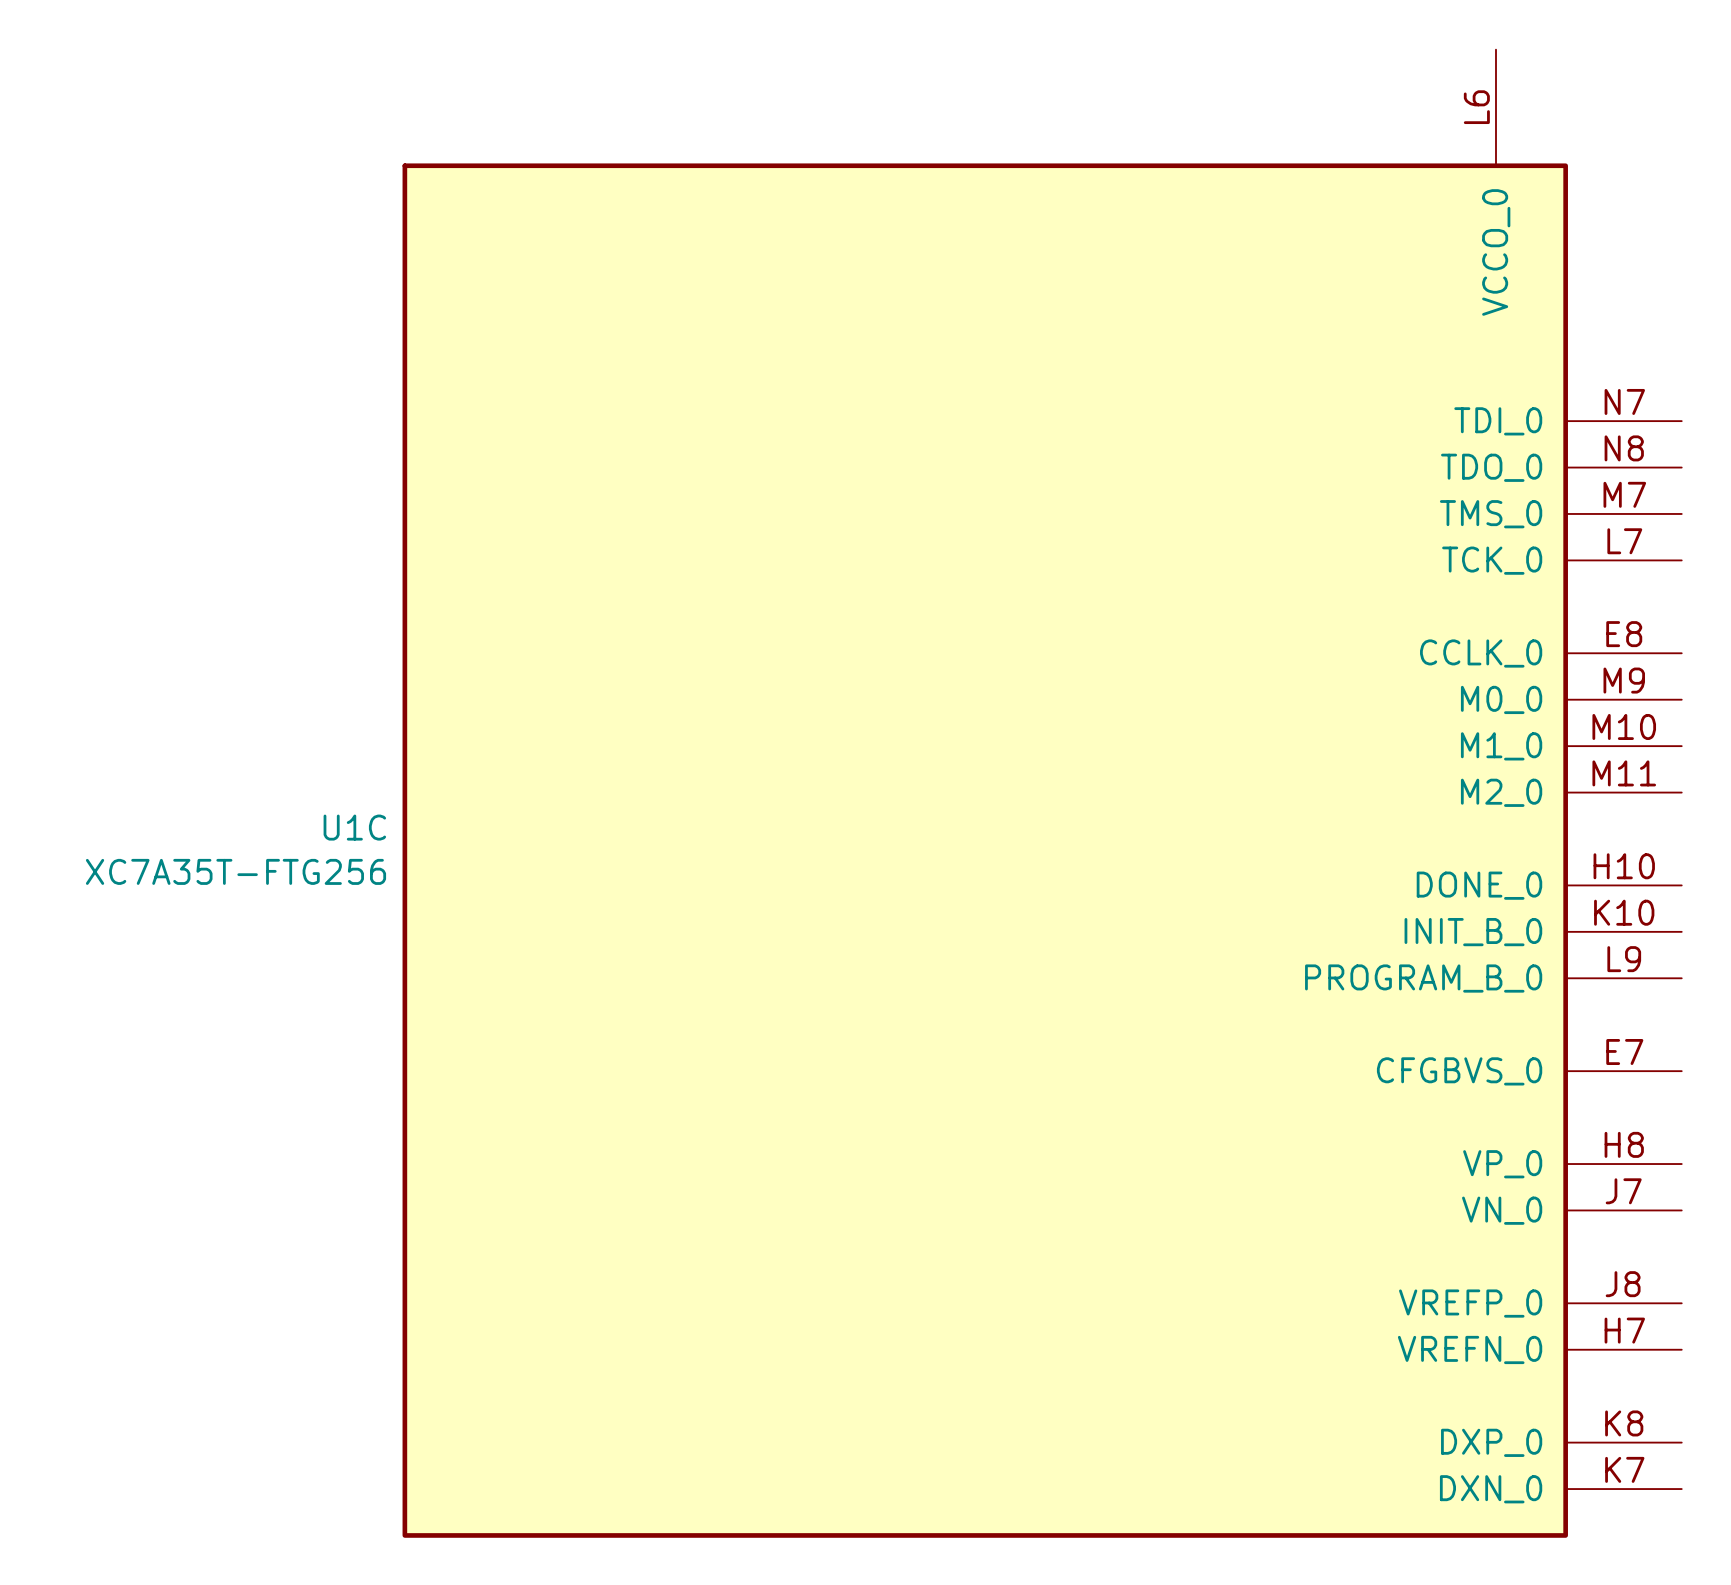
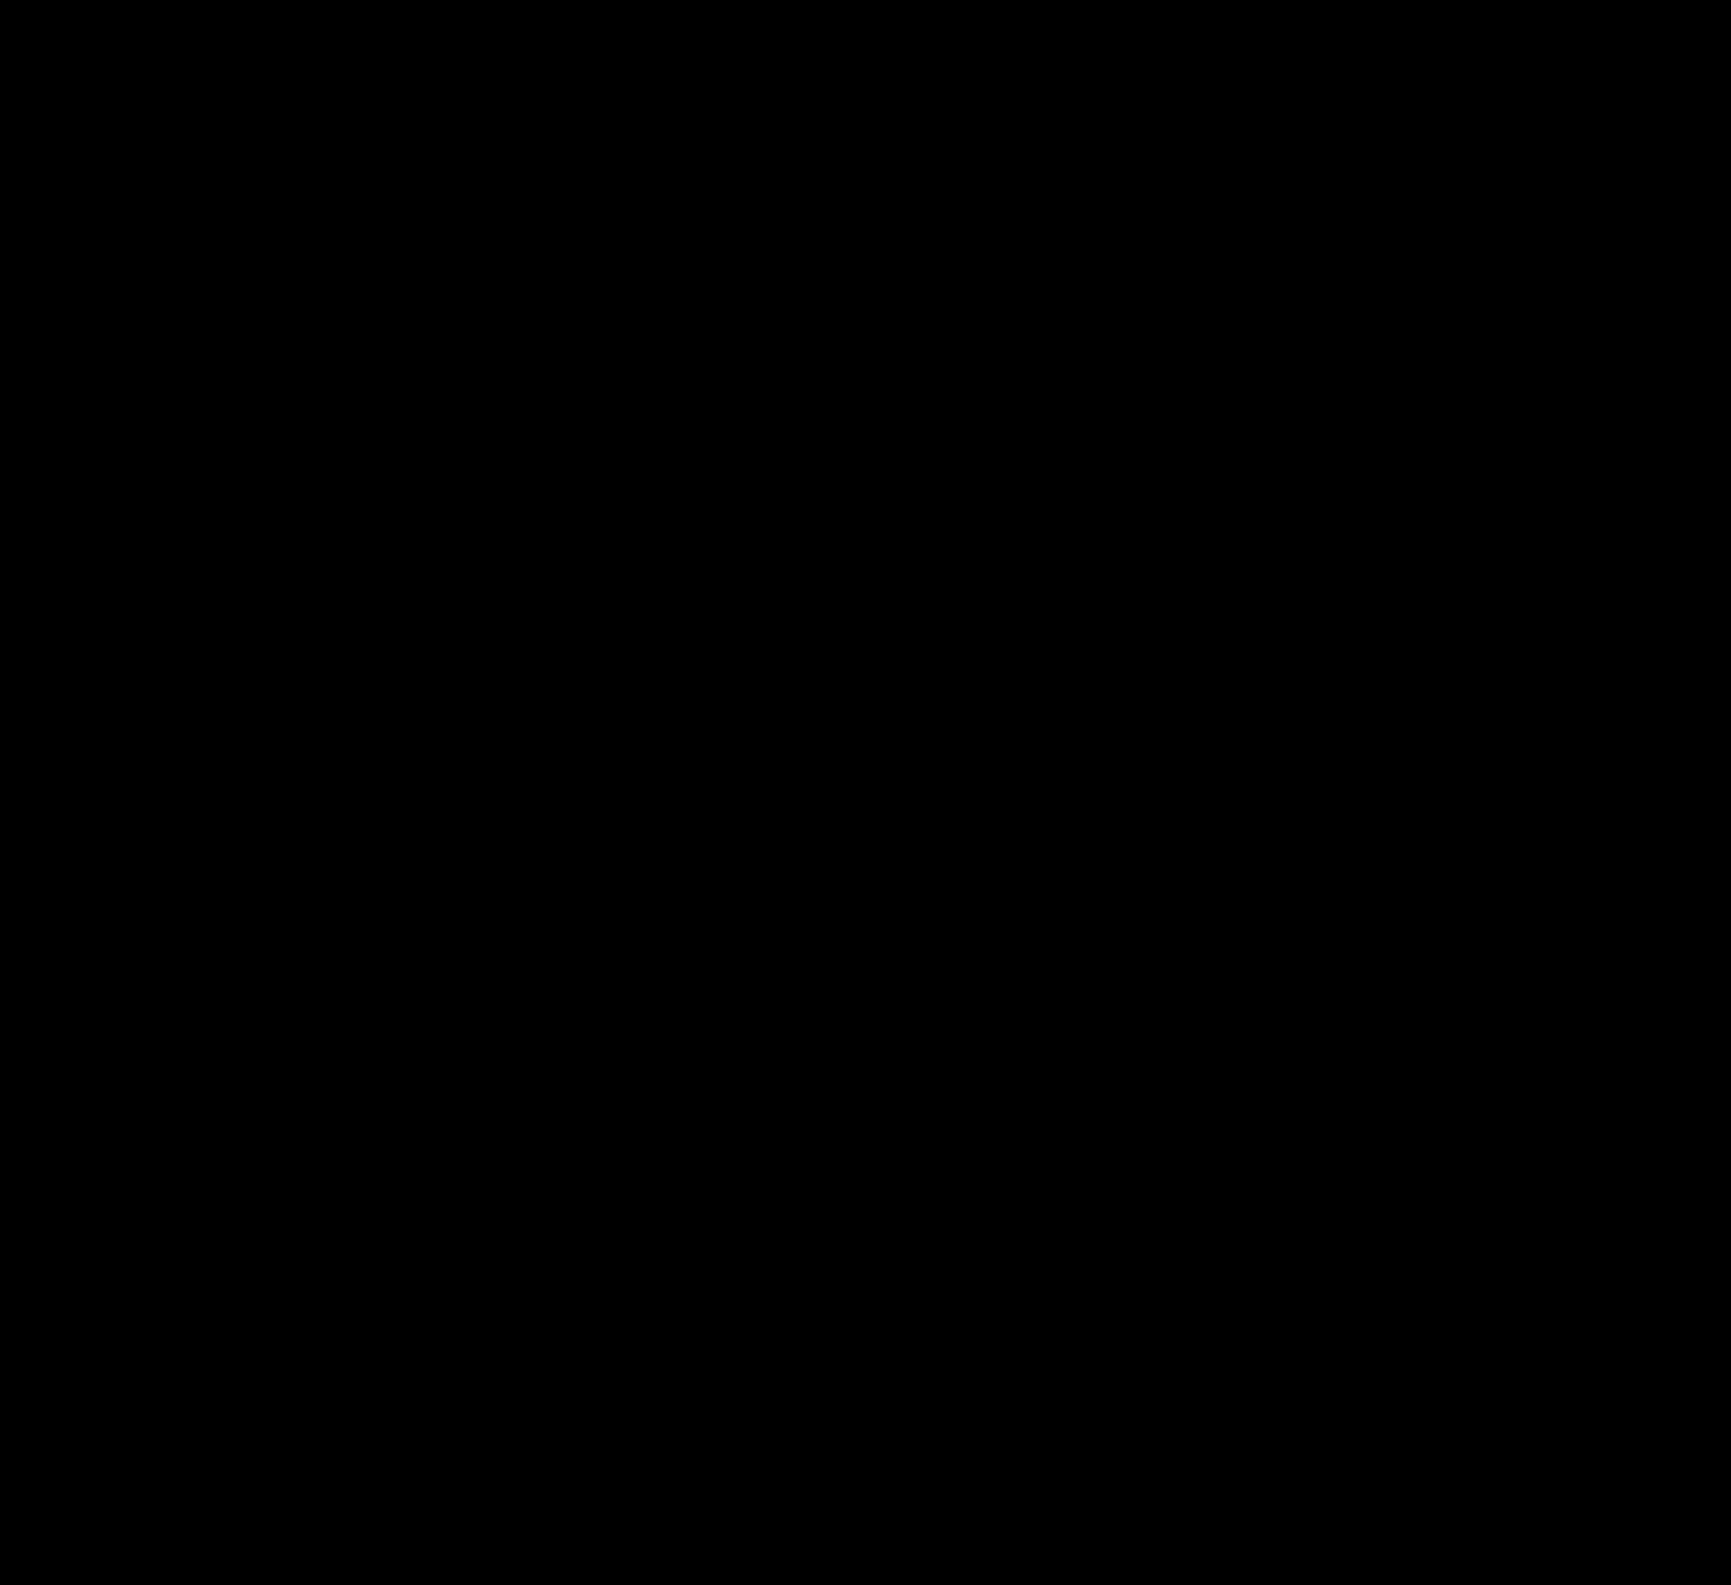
U1C: XC7A35T-FTG256 (1042, 793) -> none

